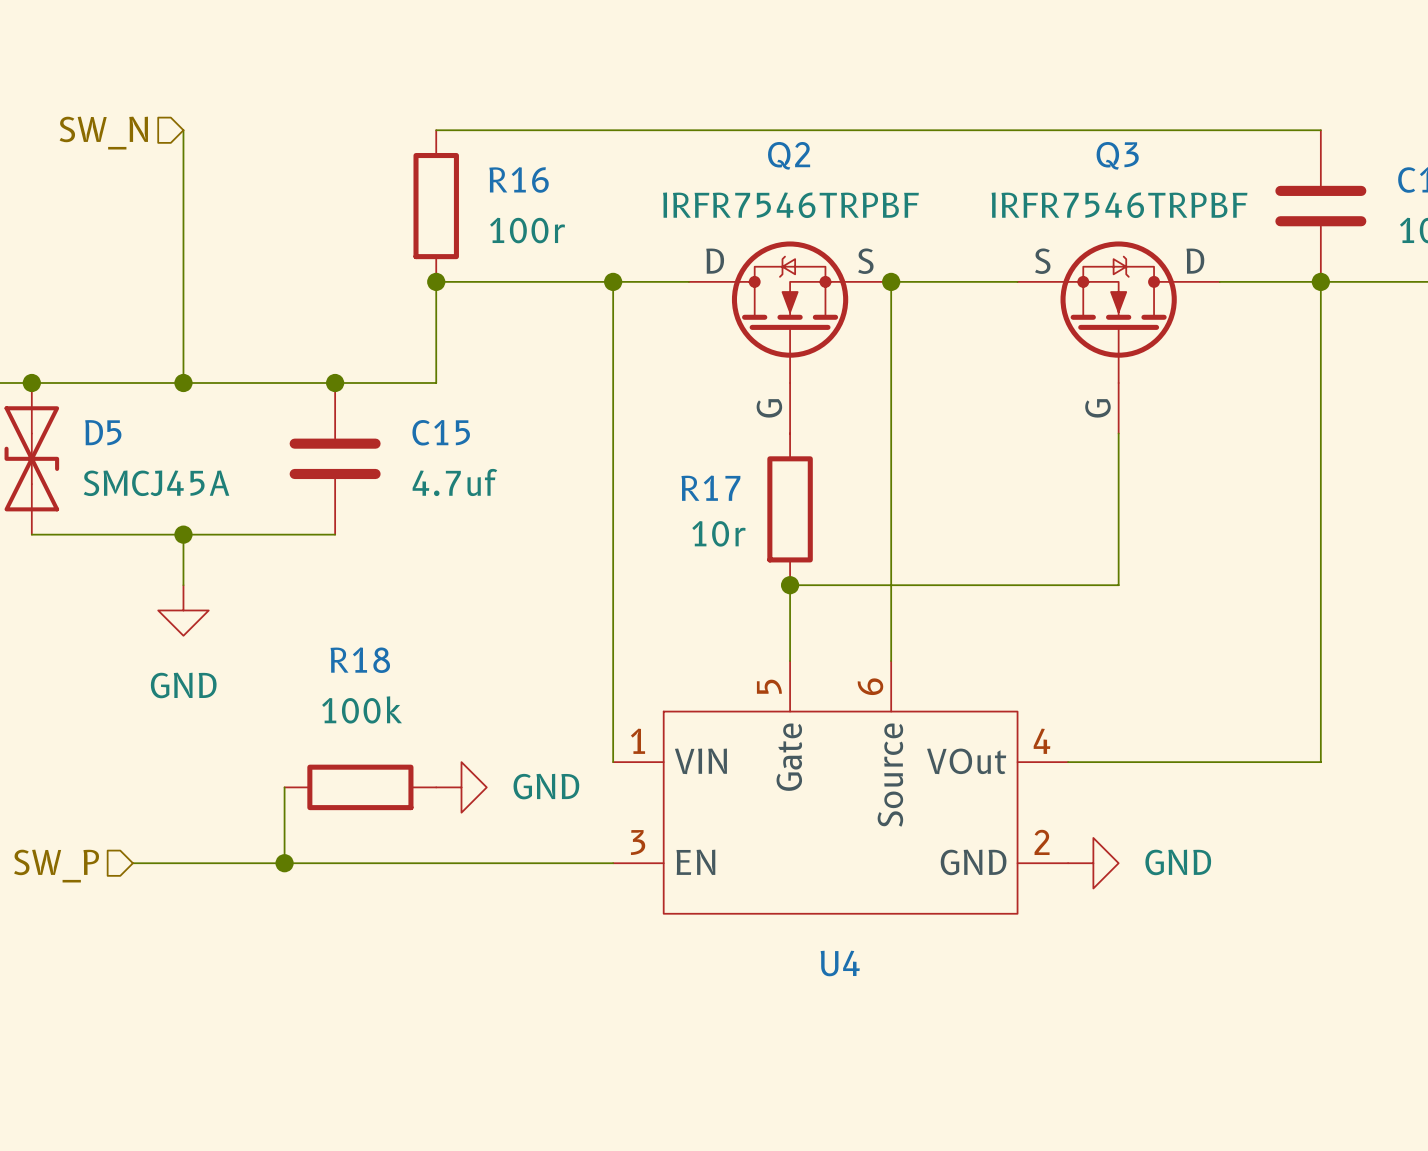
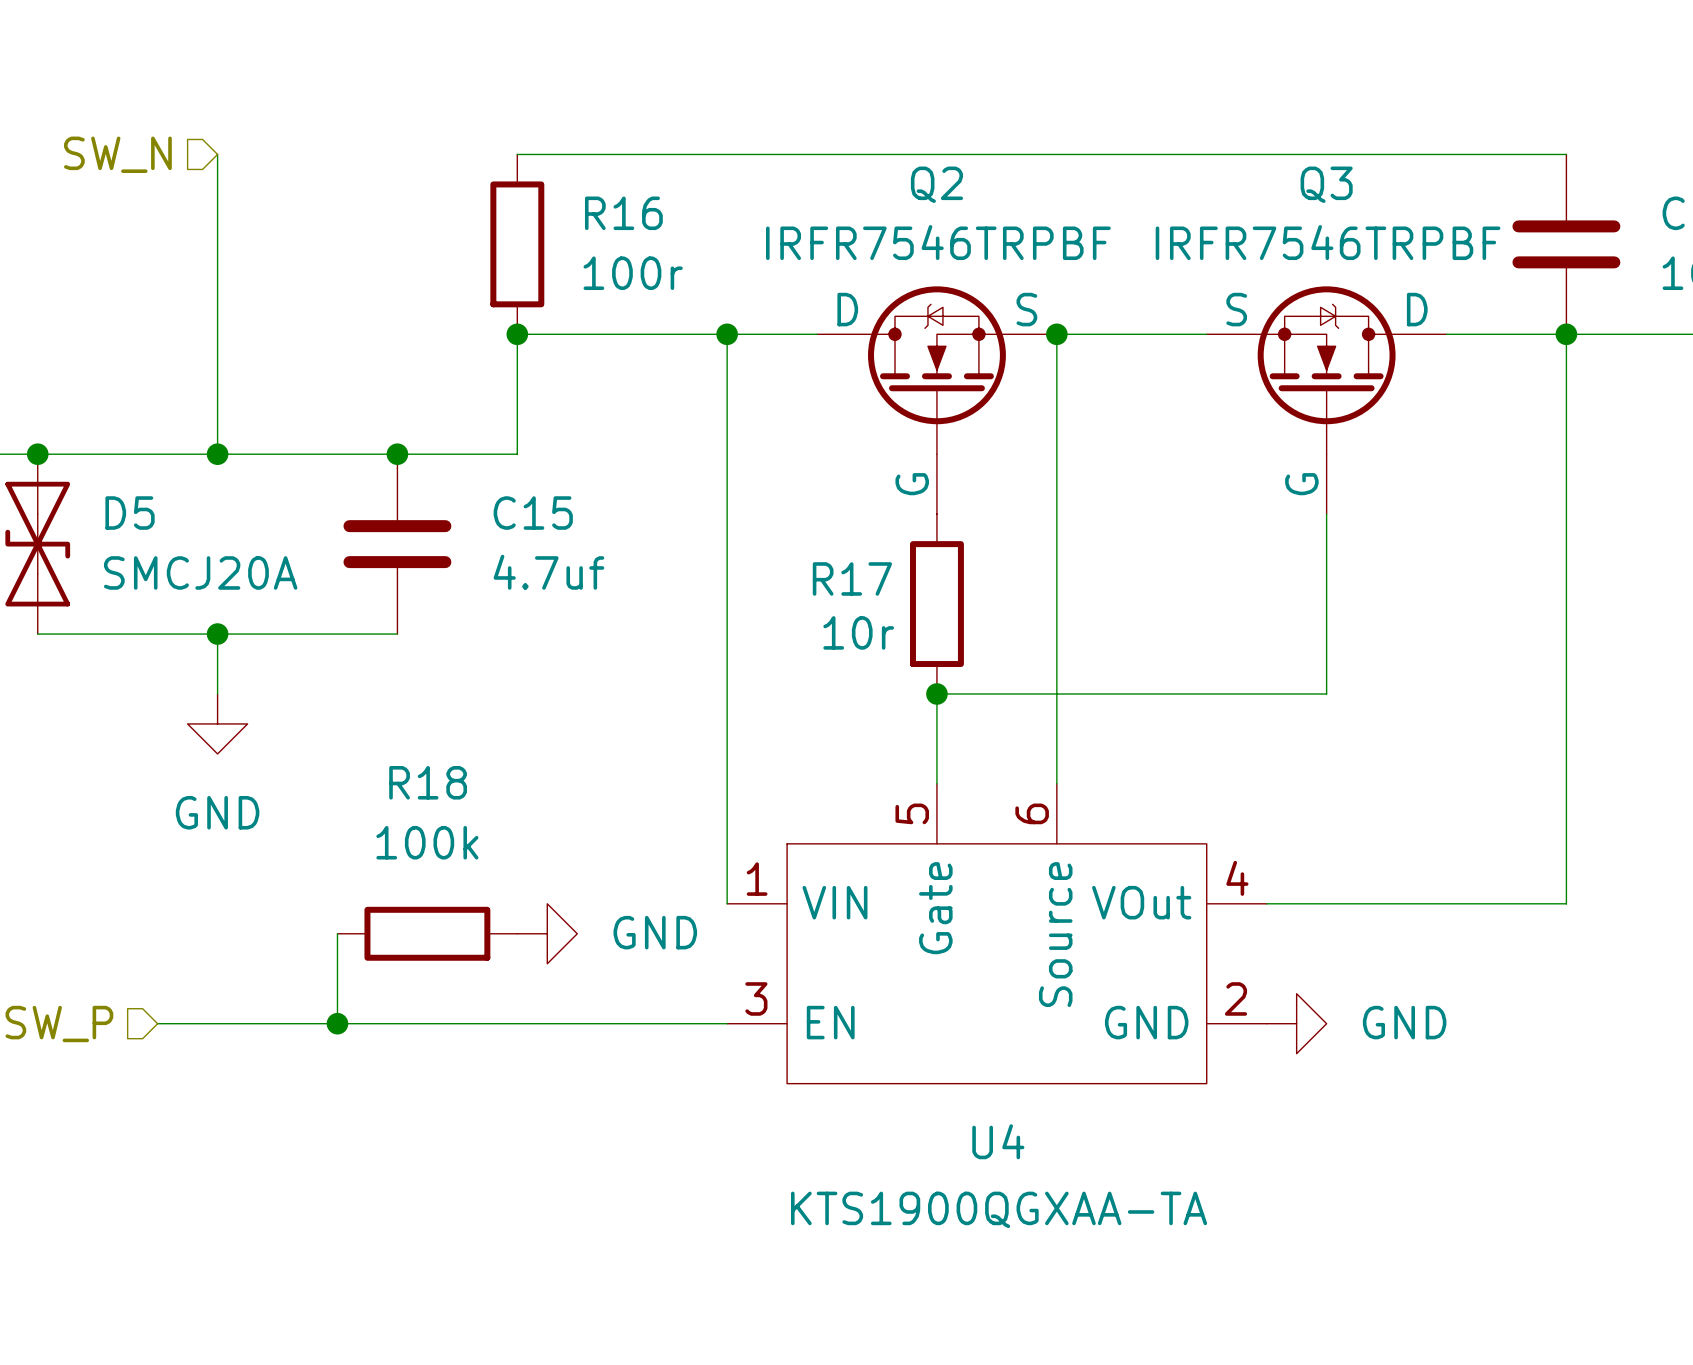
D5 value: SMCJ45A (156, 483) -> SMCJ20A (200, 572)
U4 value: none -> KTS1900QGXAA-TA (999, 1209)

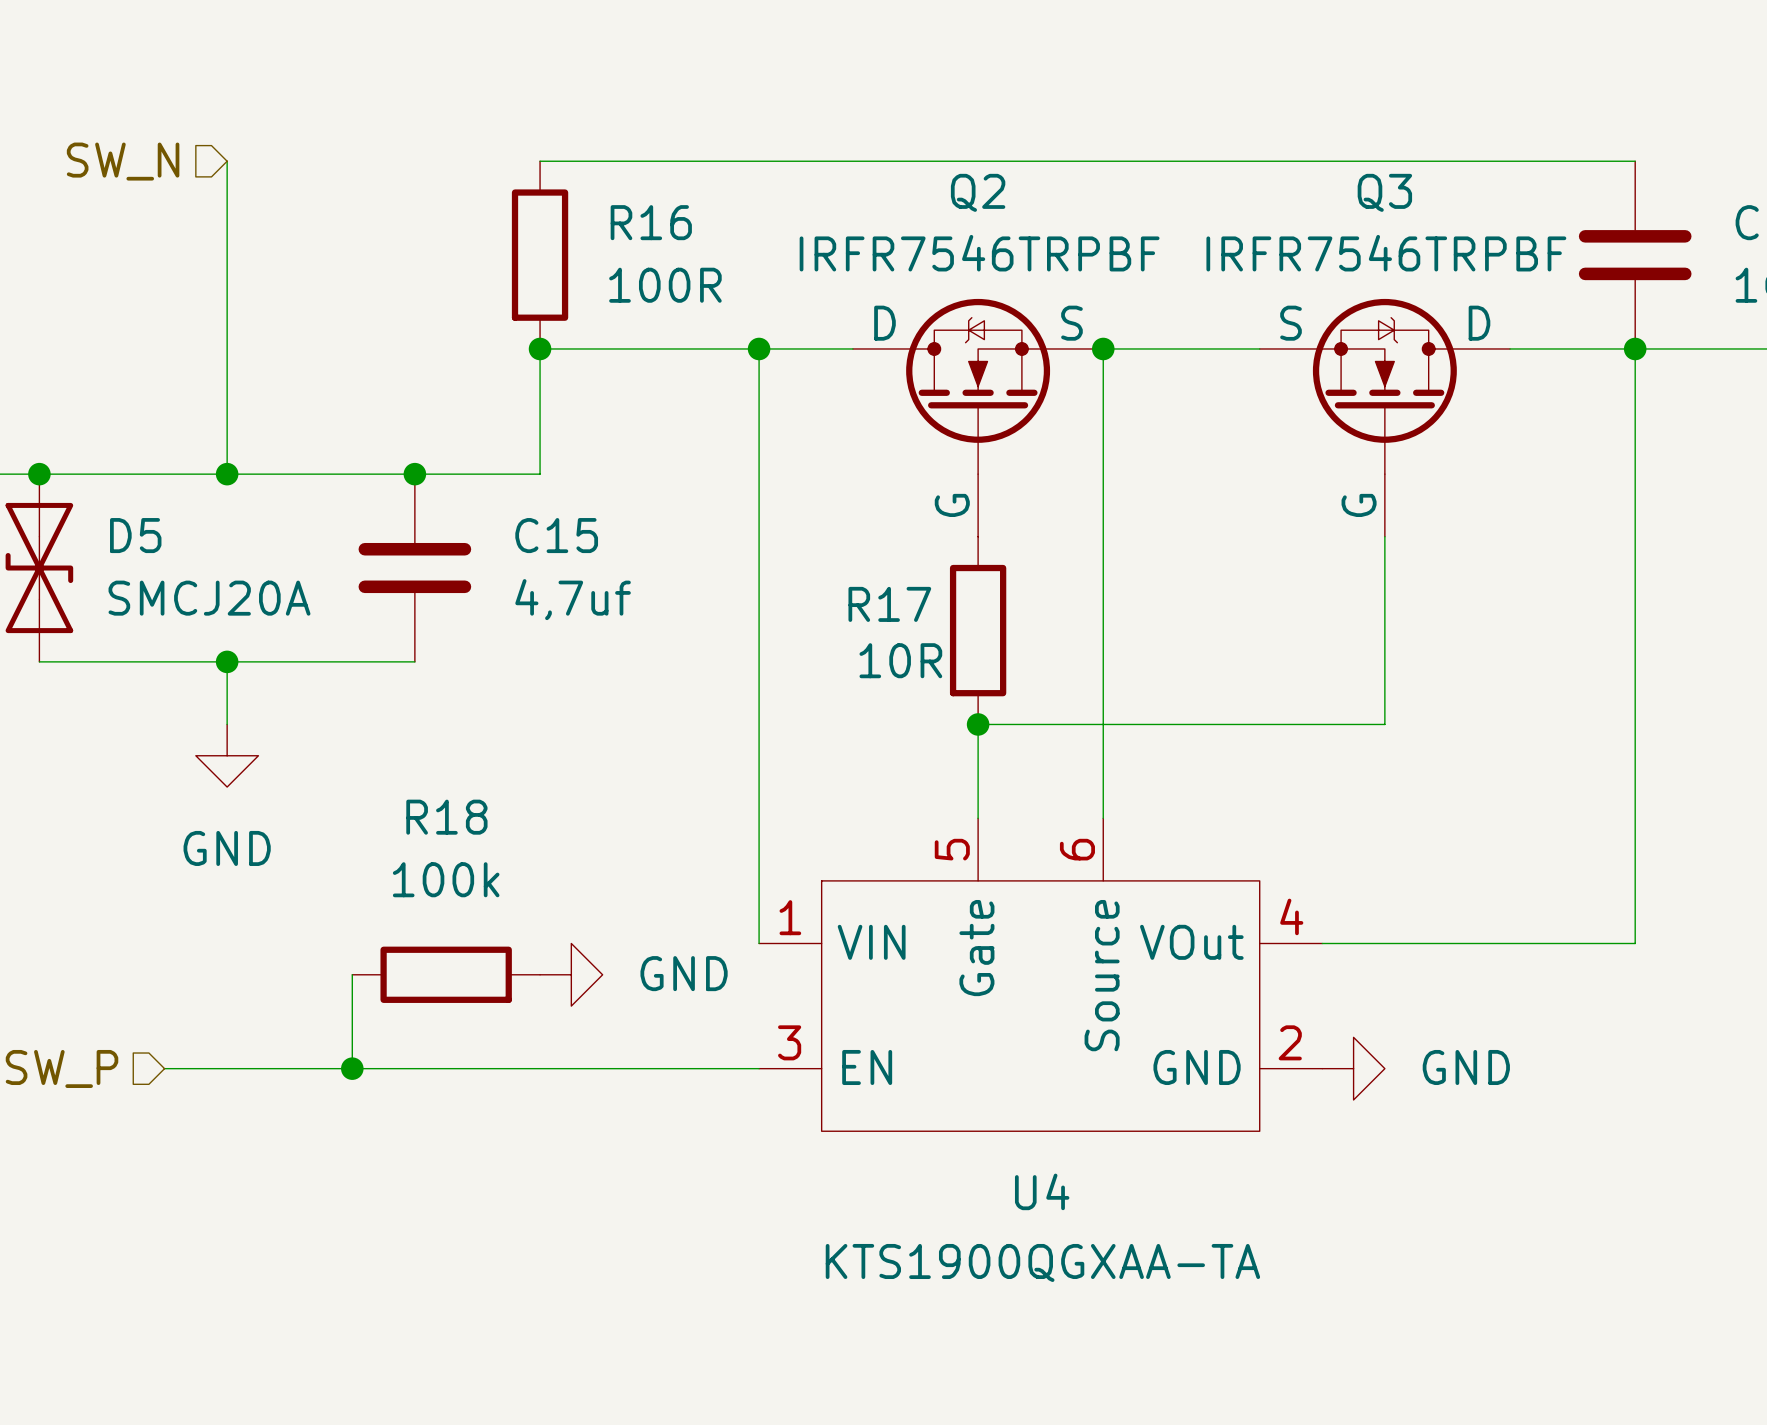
R16 value: 100r (633, 273) -> 100R (665, 285)
C15 value: 4.7uf (548, 572) -> 4,7uf (573, 599)
R17 value: 10r (858, 632) -> 10R (900, 660)

